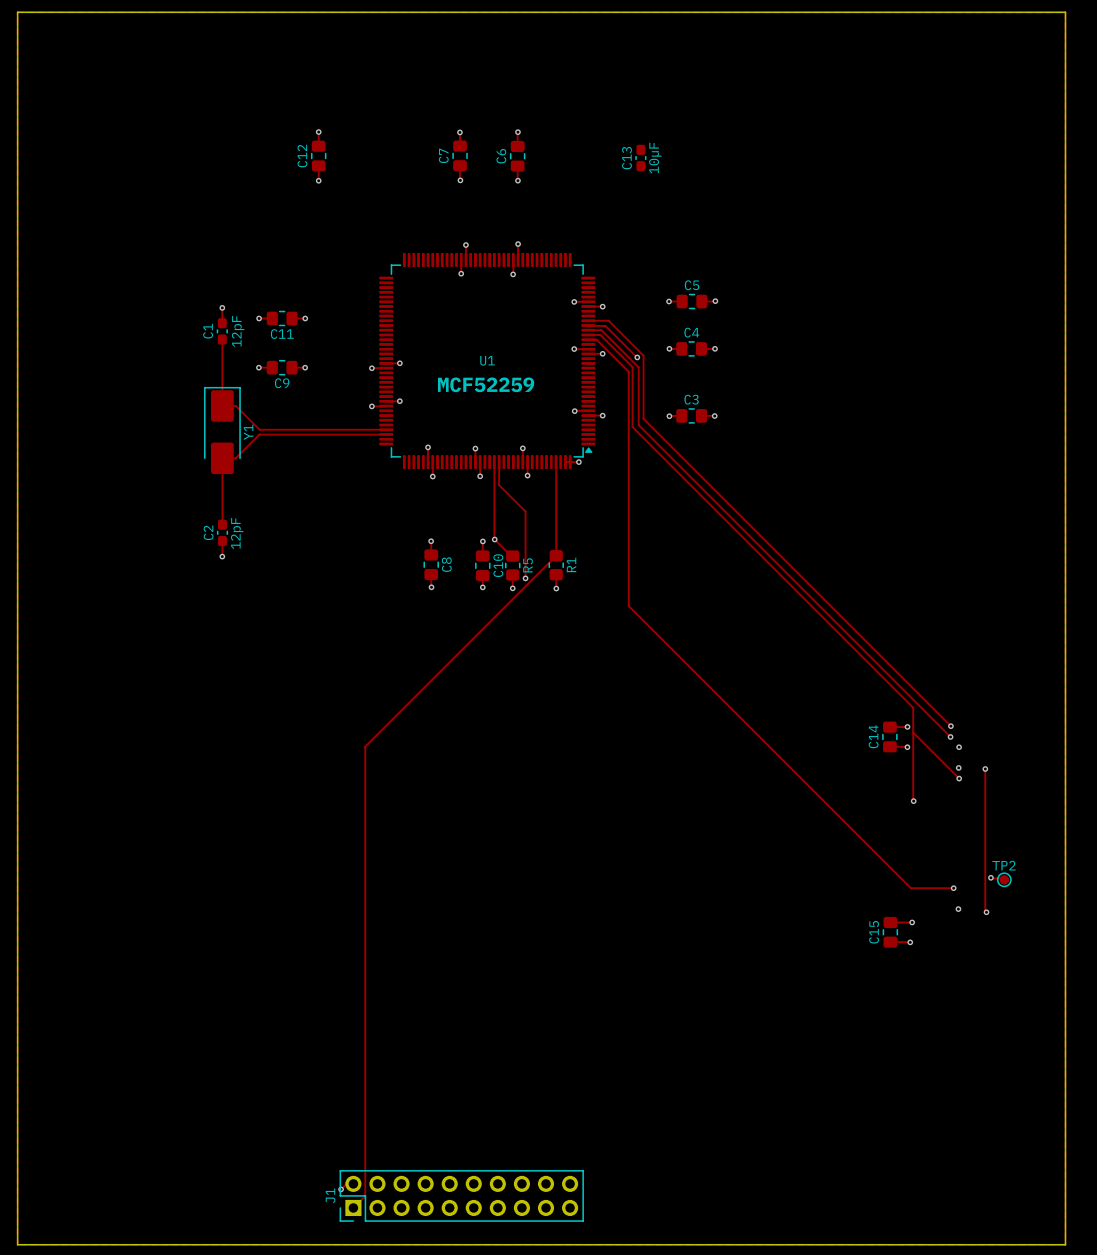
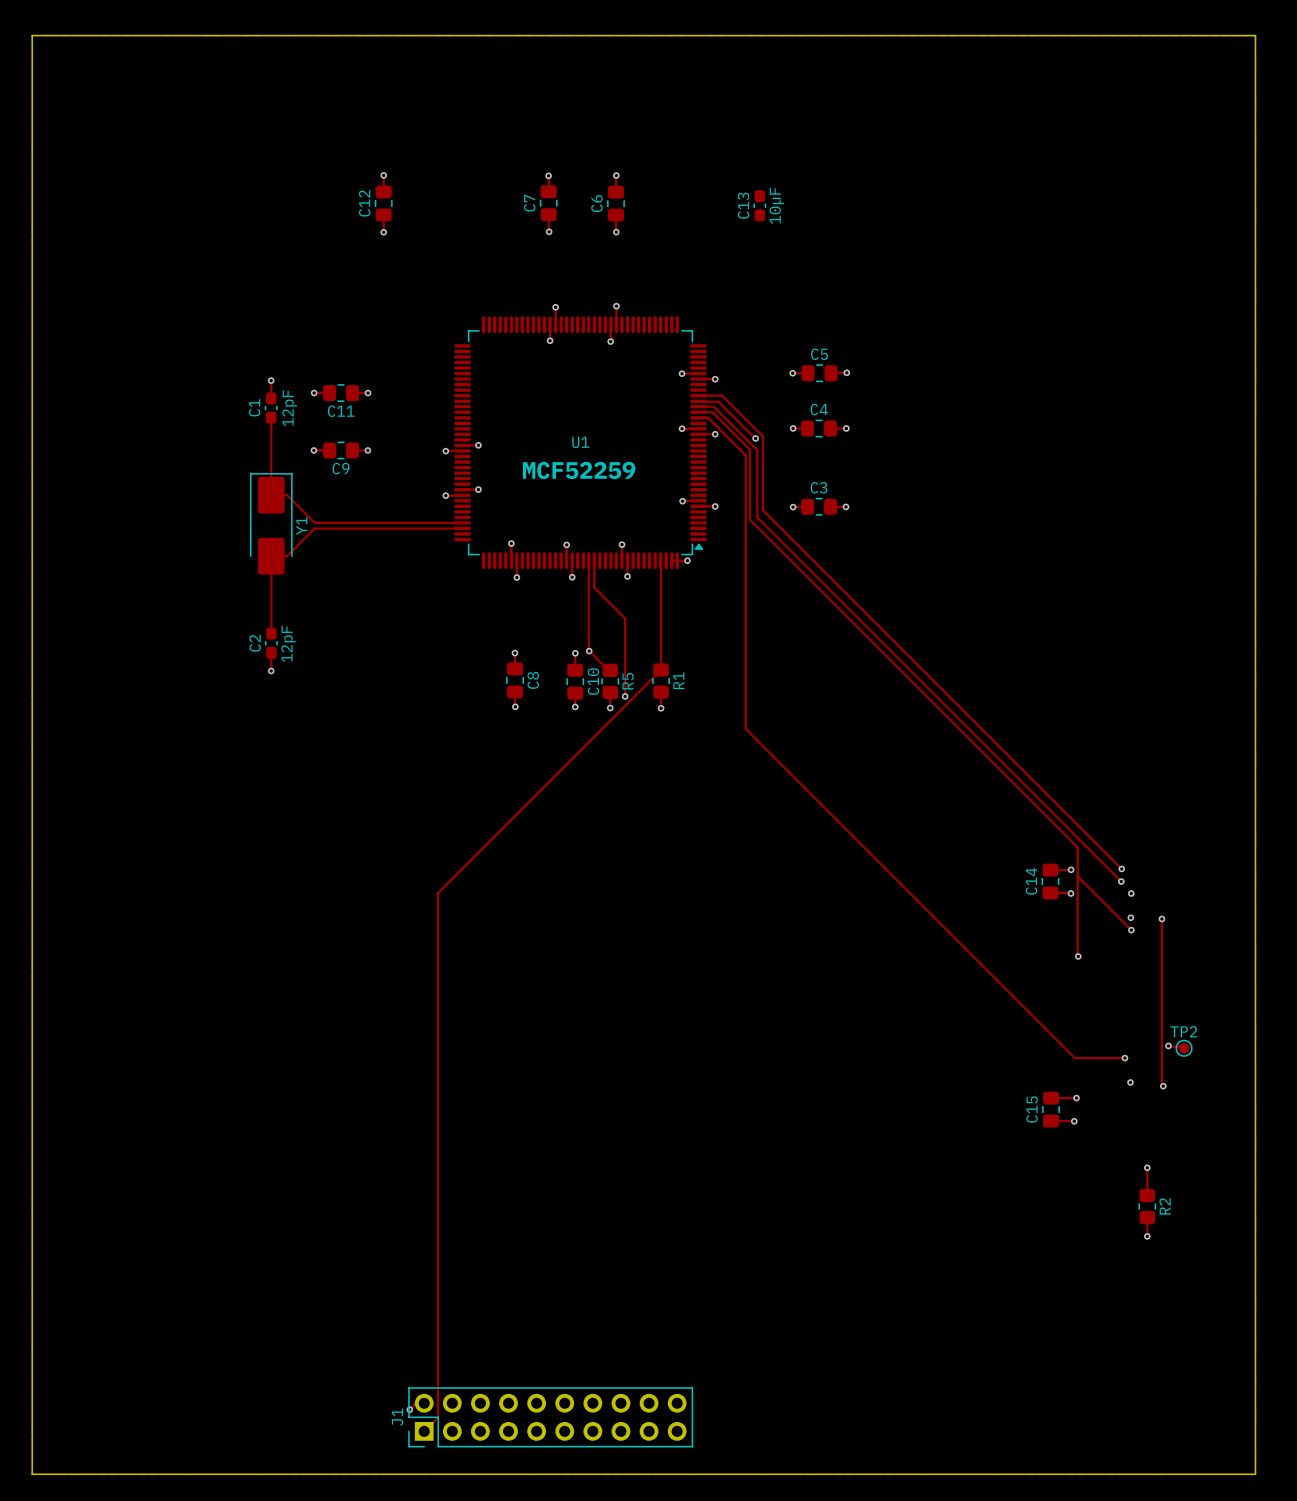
track: none -> (1147, 1167) (1147, 1195)
via: none -> (1147, 1167)
R2: none -> (1147, 1206)
track: none -> (1147, 1217) (1147, 1236)
via: none -> (1147, 1236)

